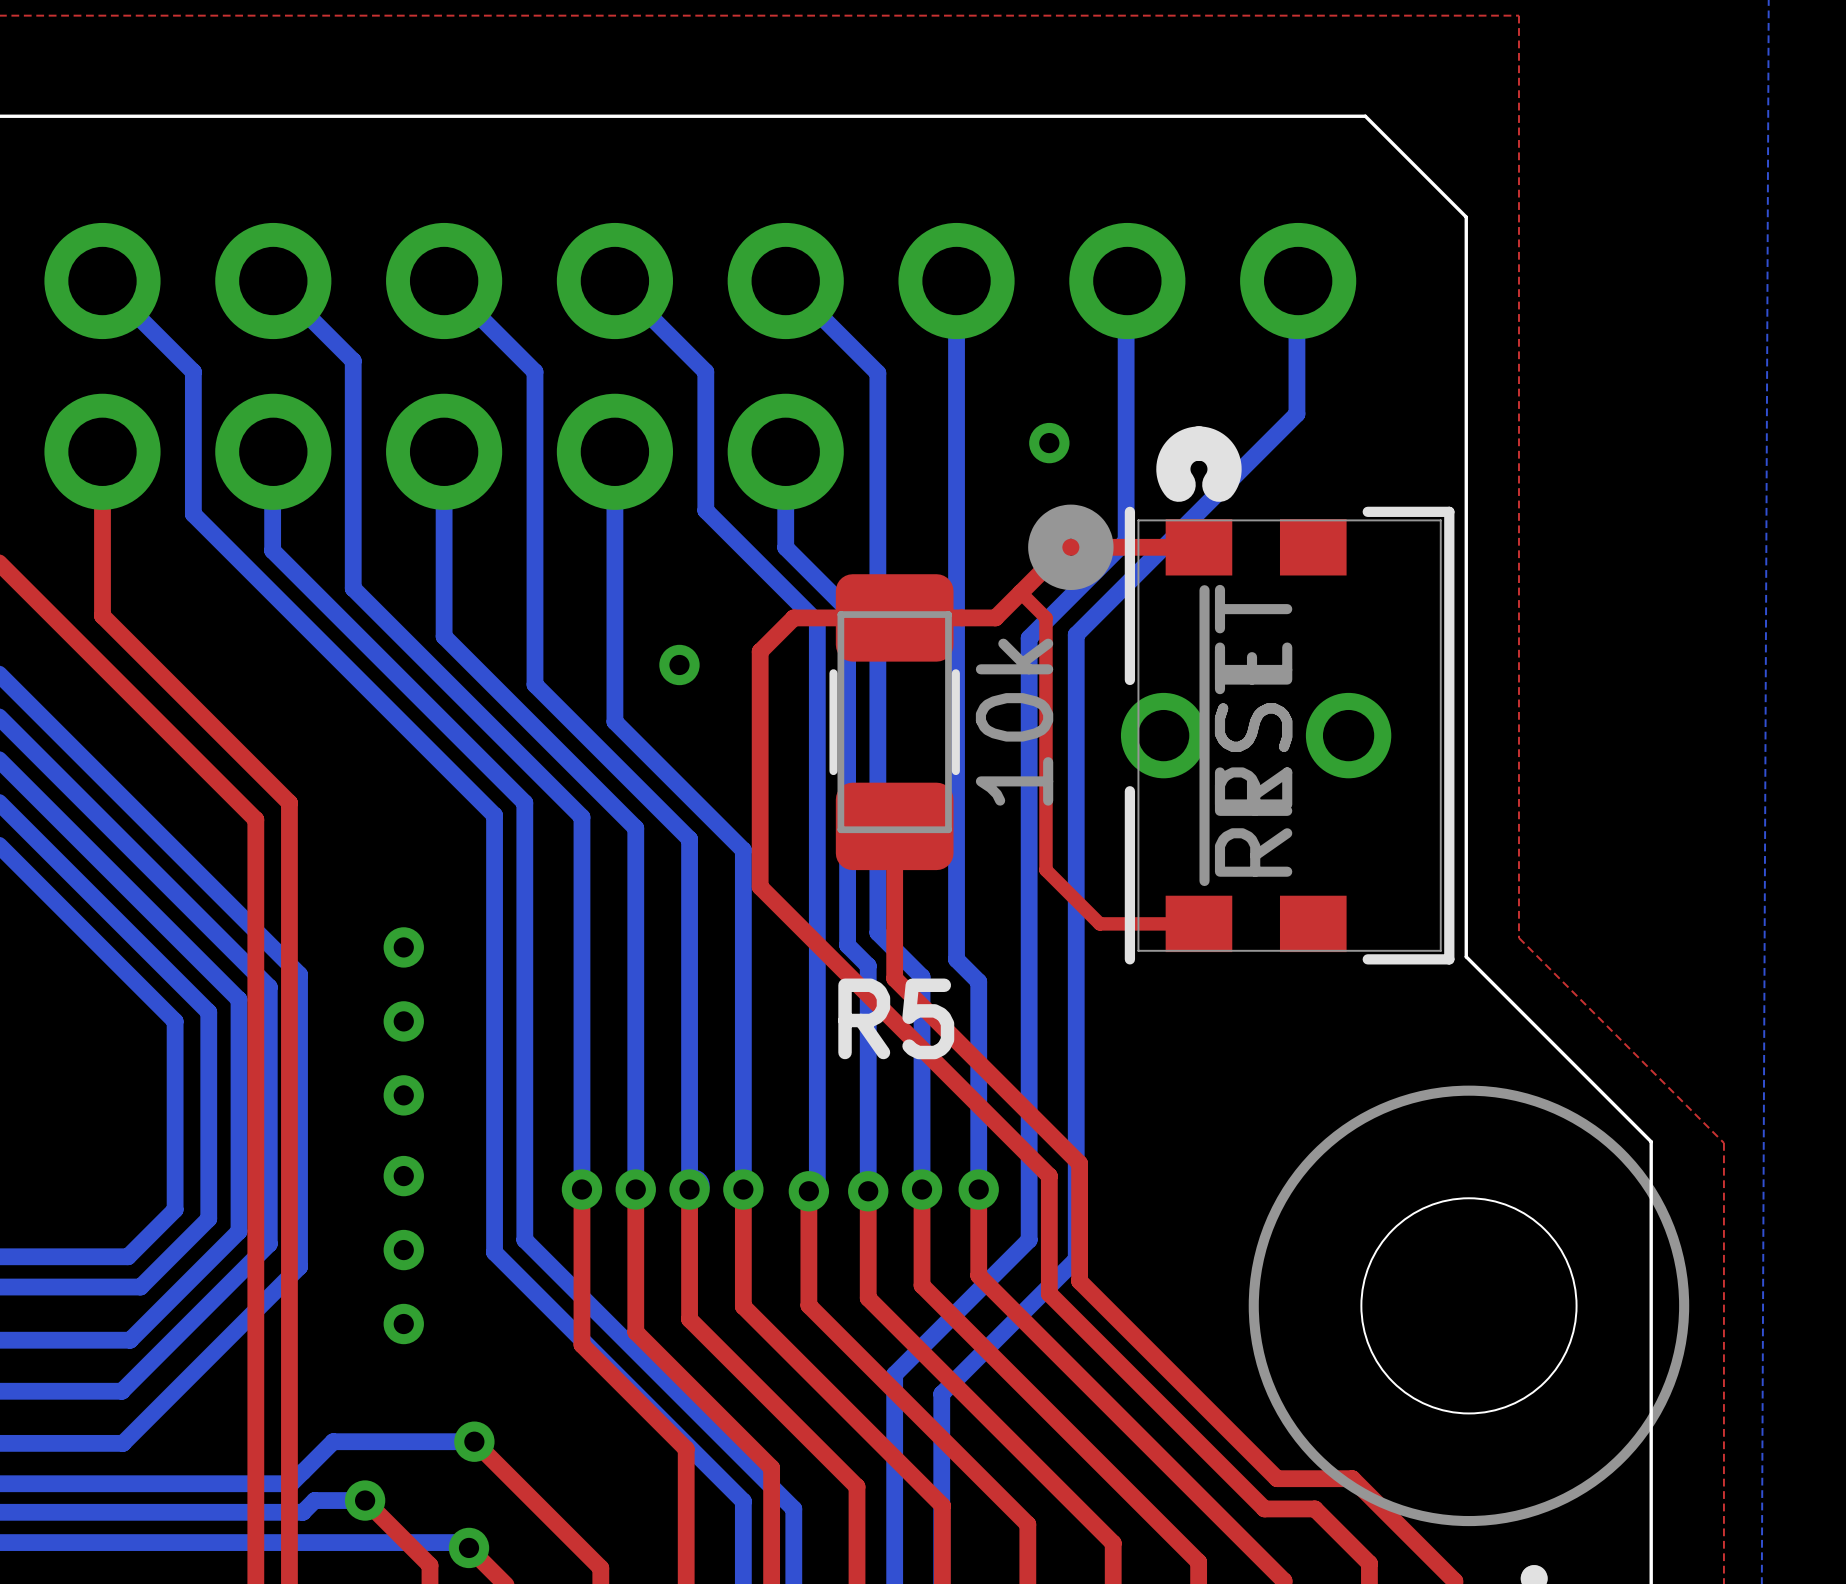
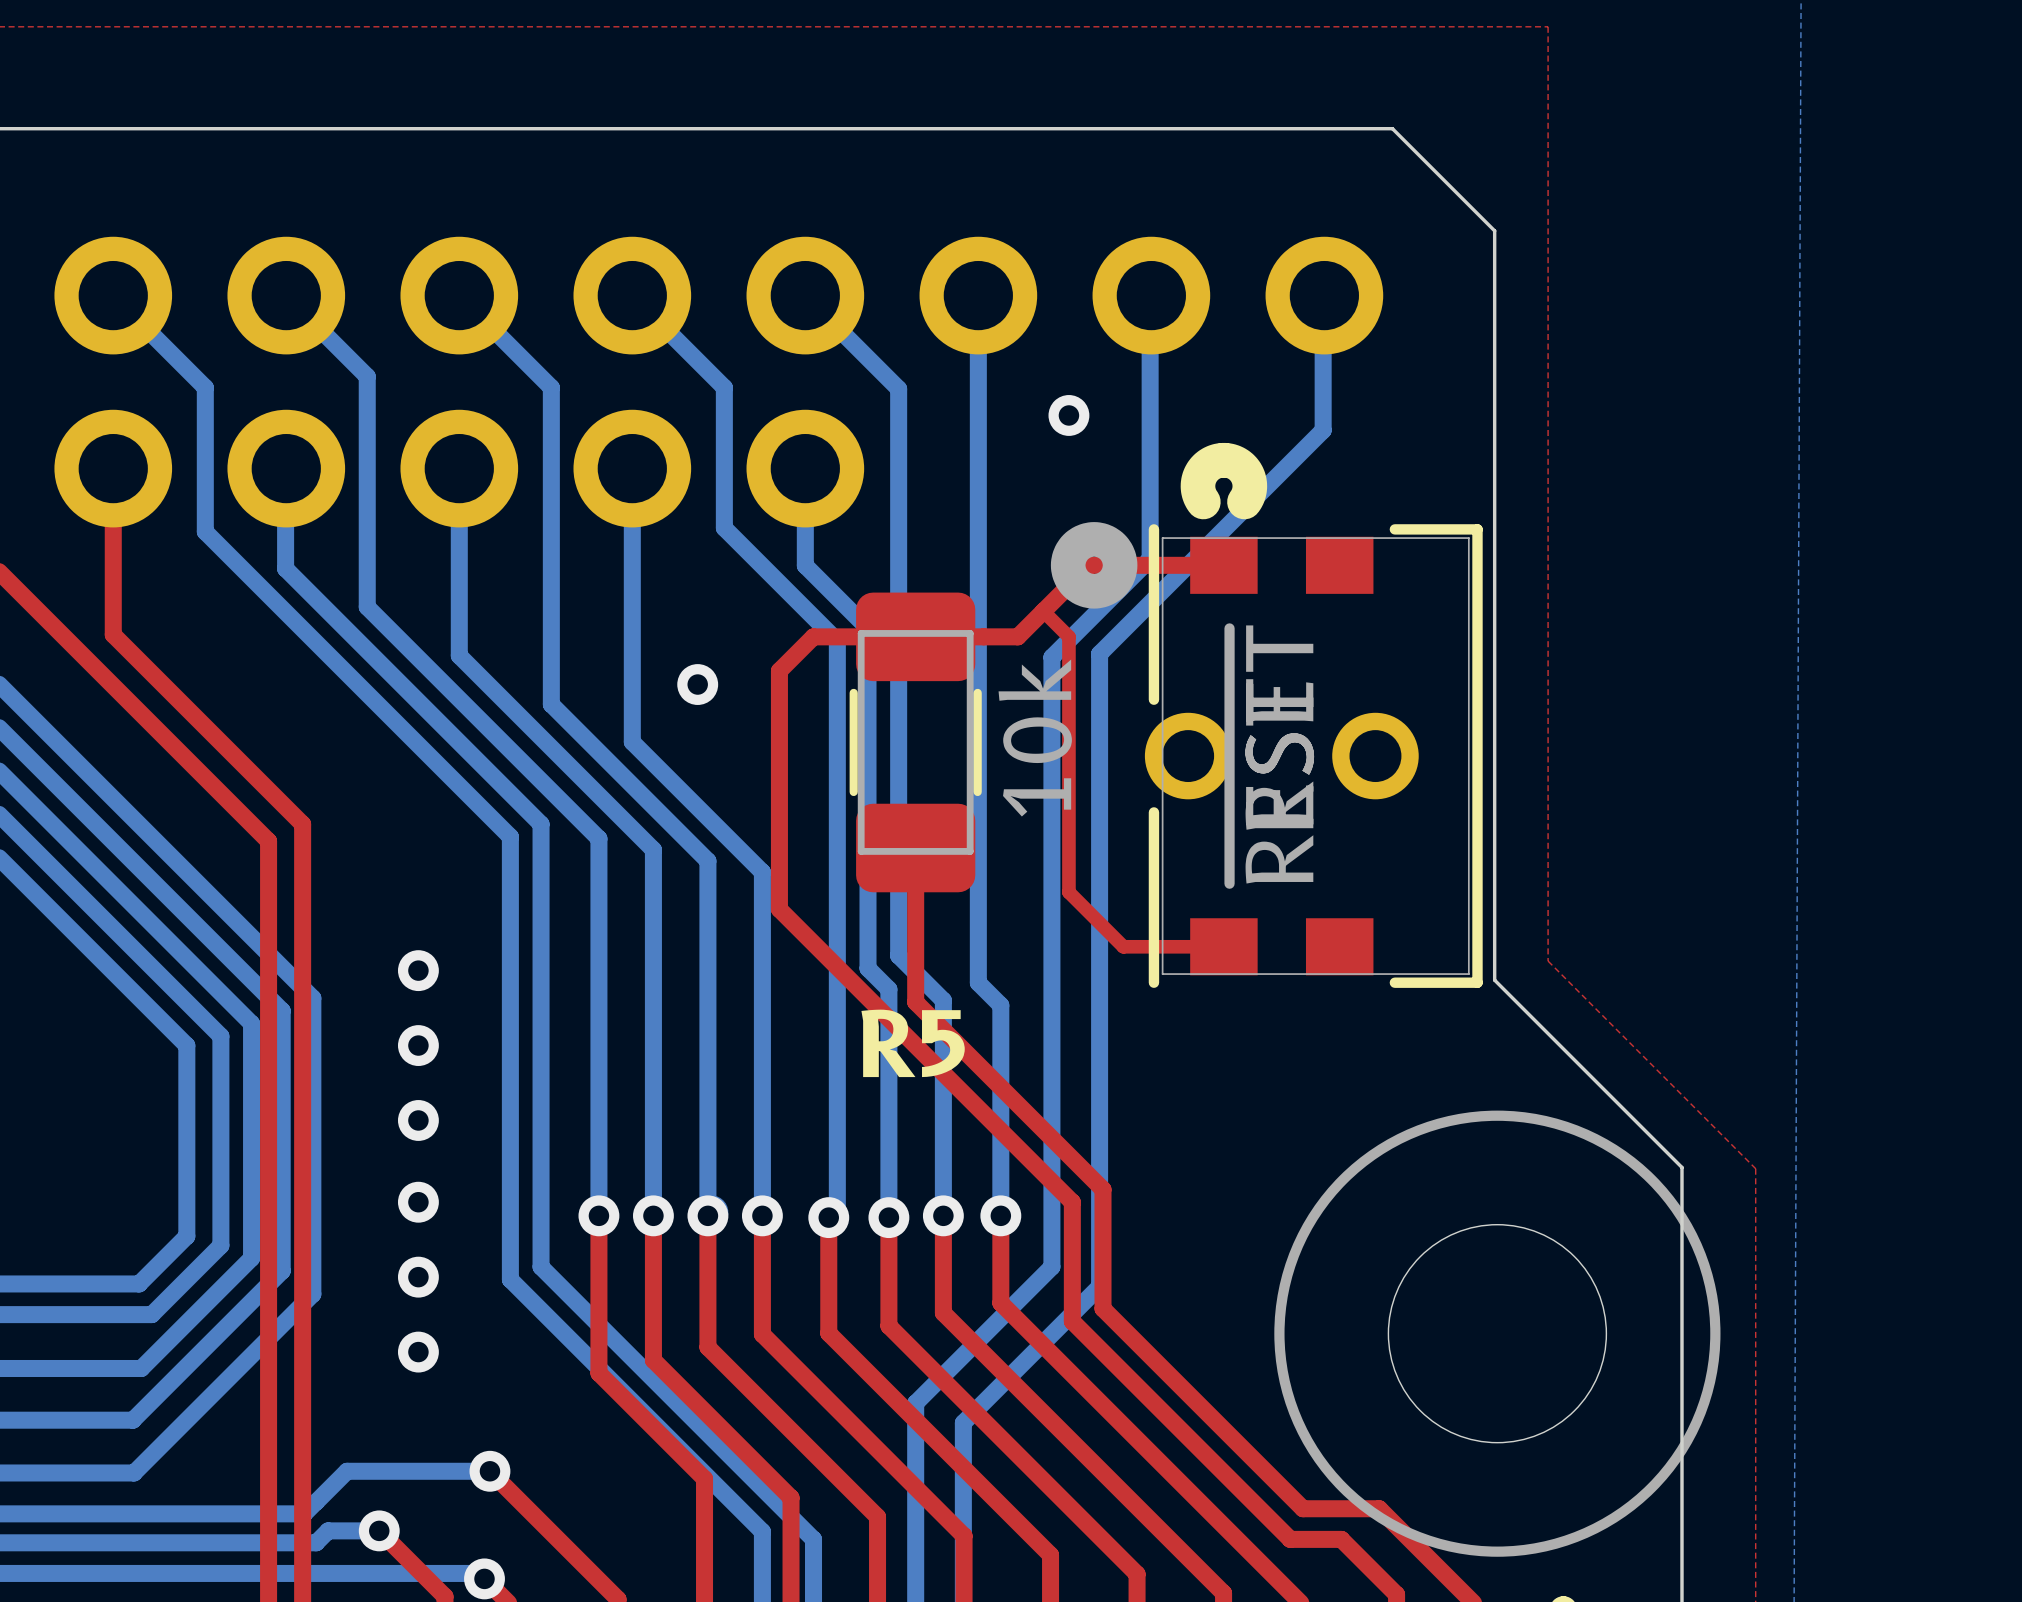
via position: (1049, 443) -> (1068, 415)

